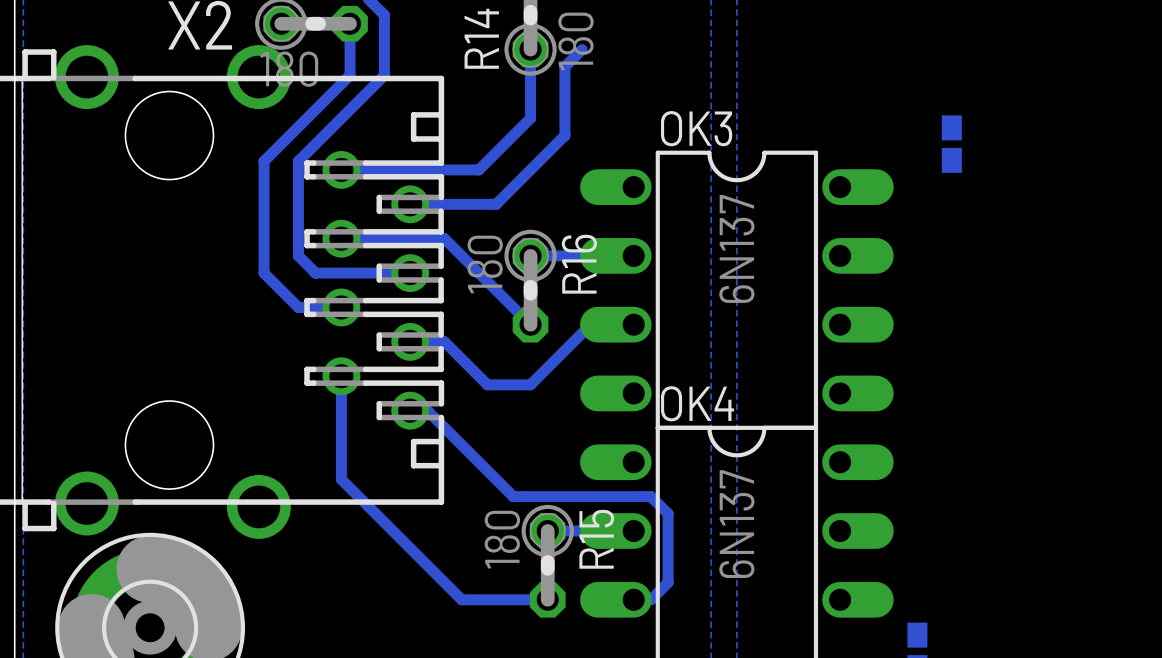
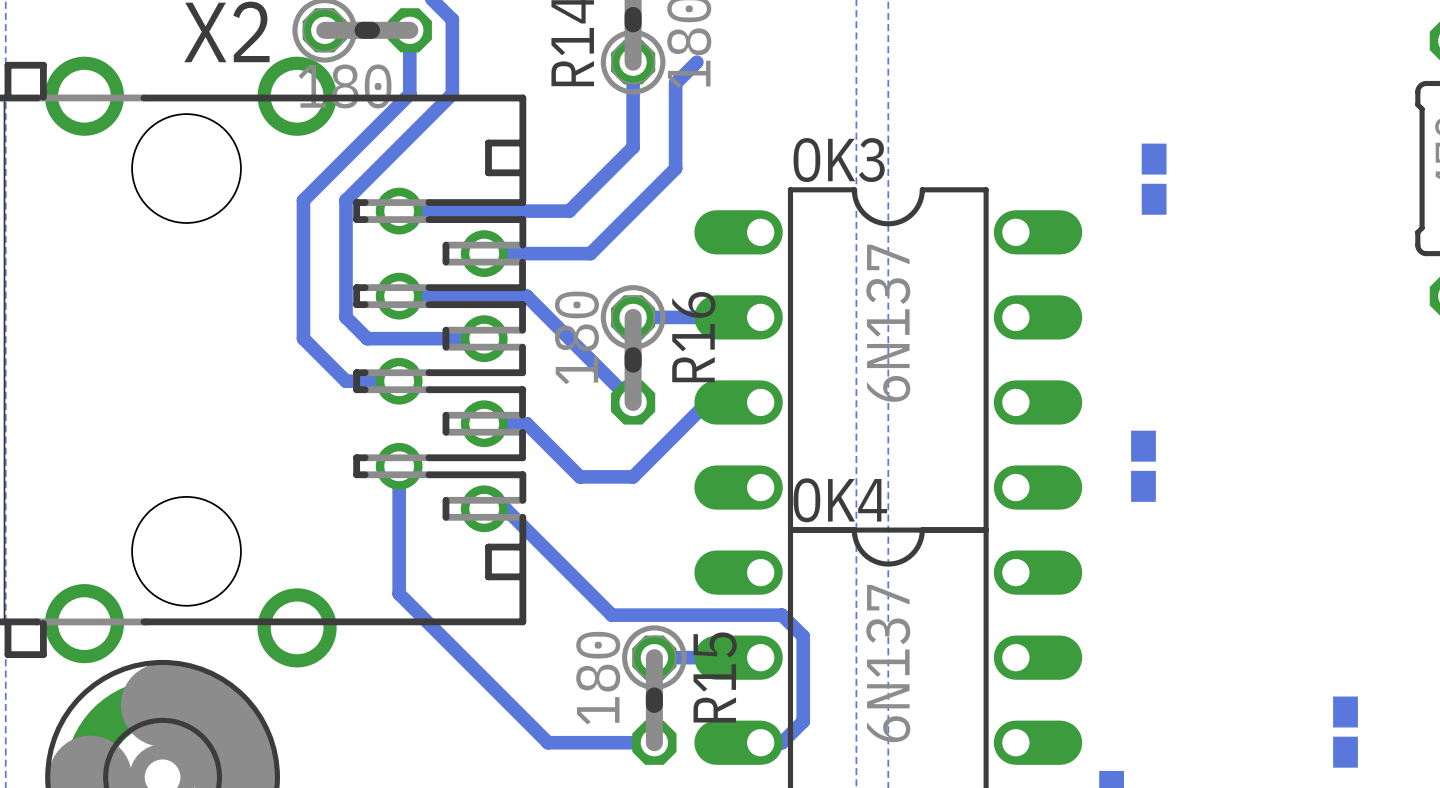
part: none -> (1143, 466)
part: none -> (1345, 732)

